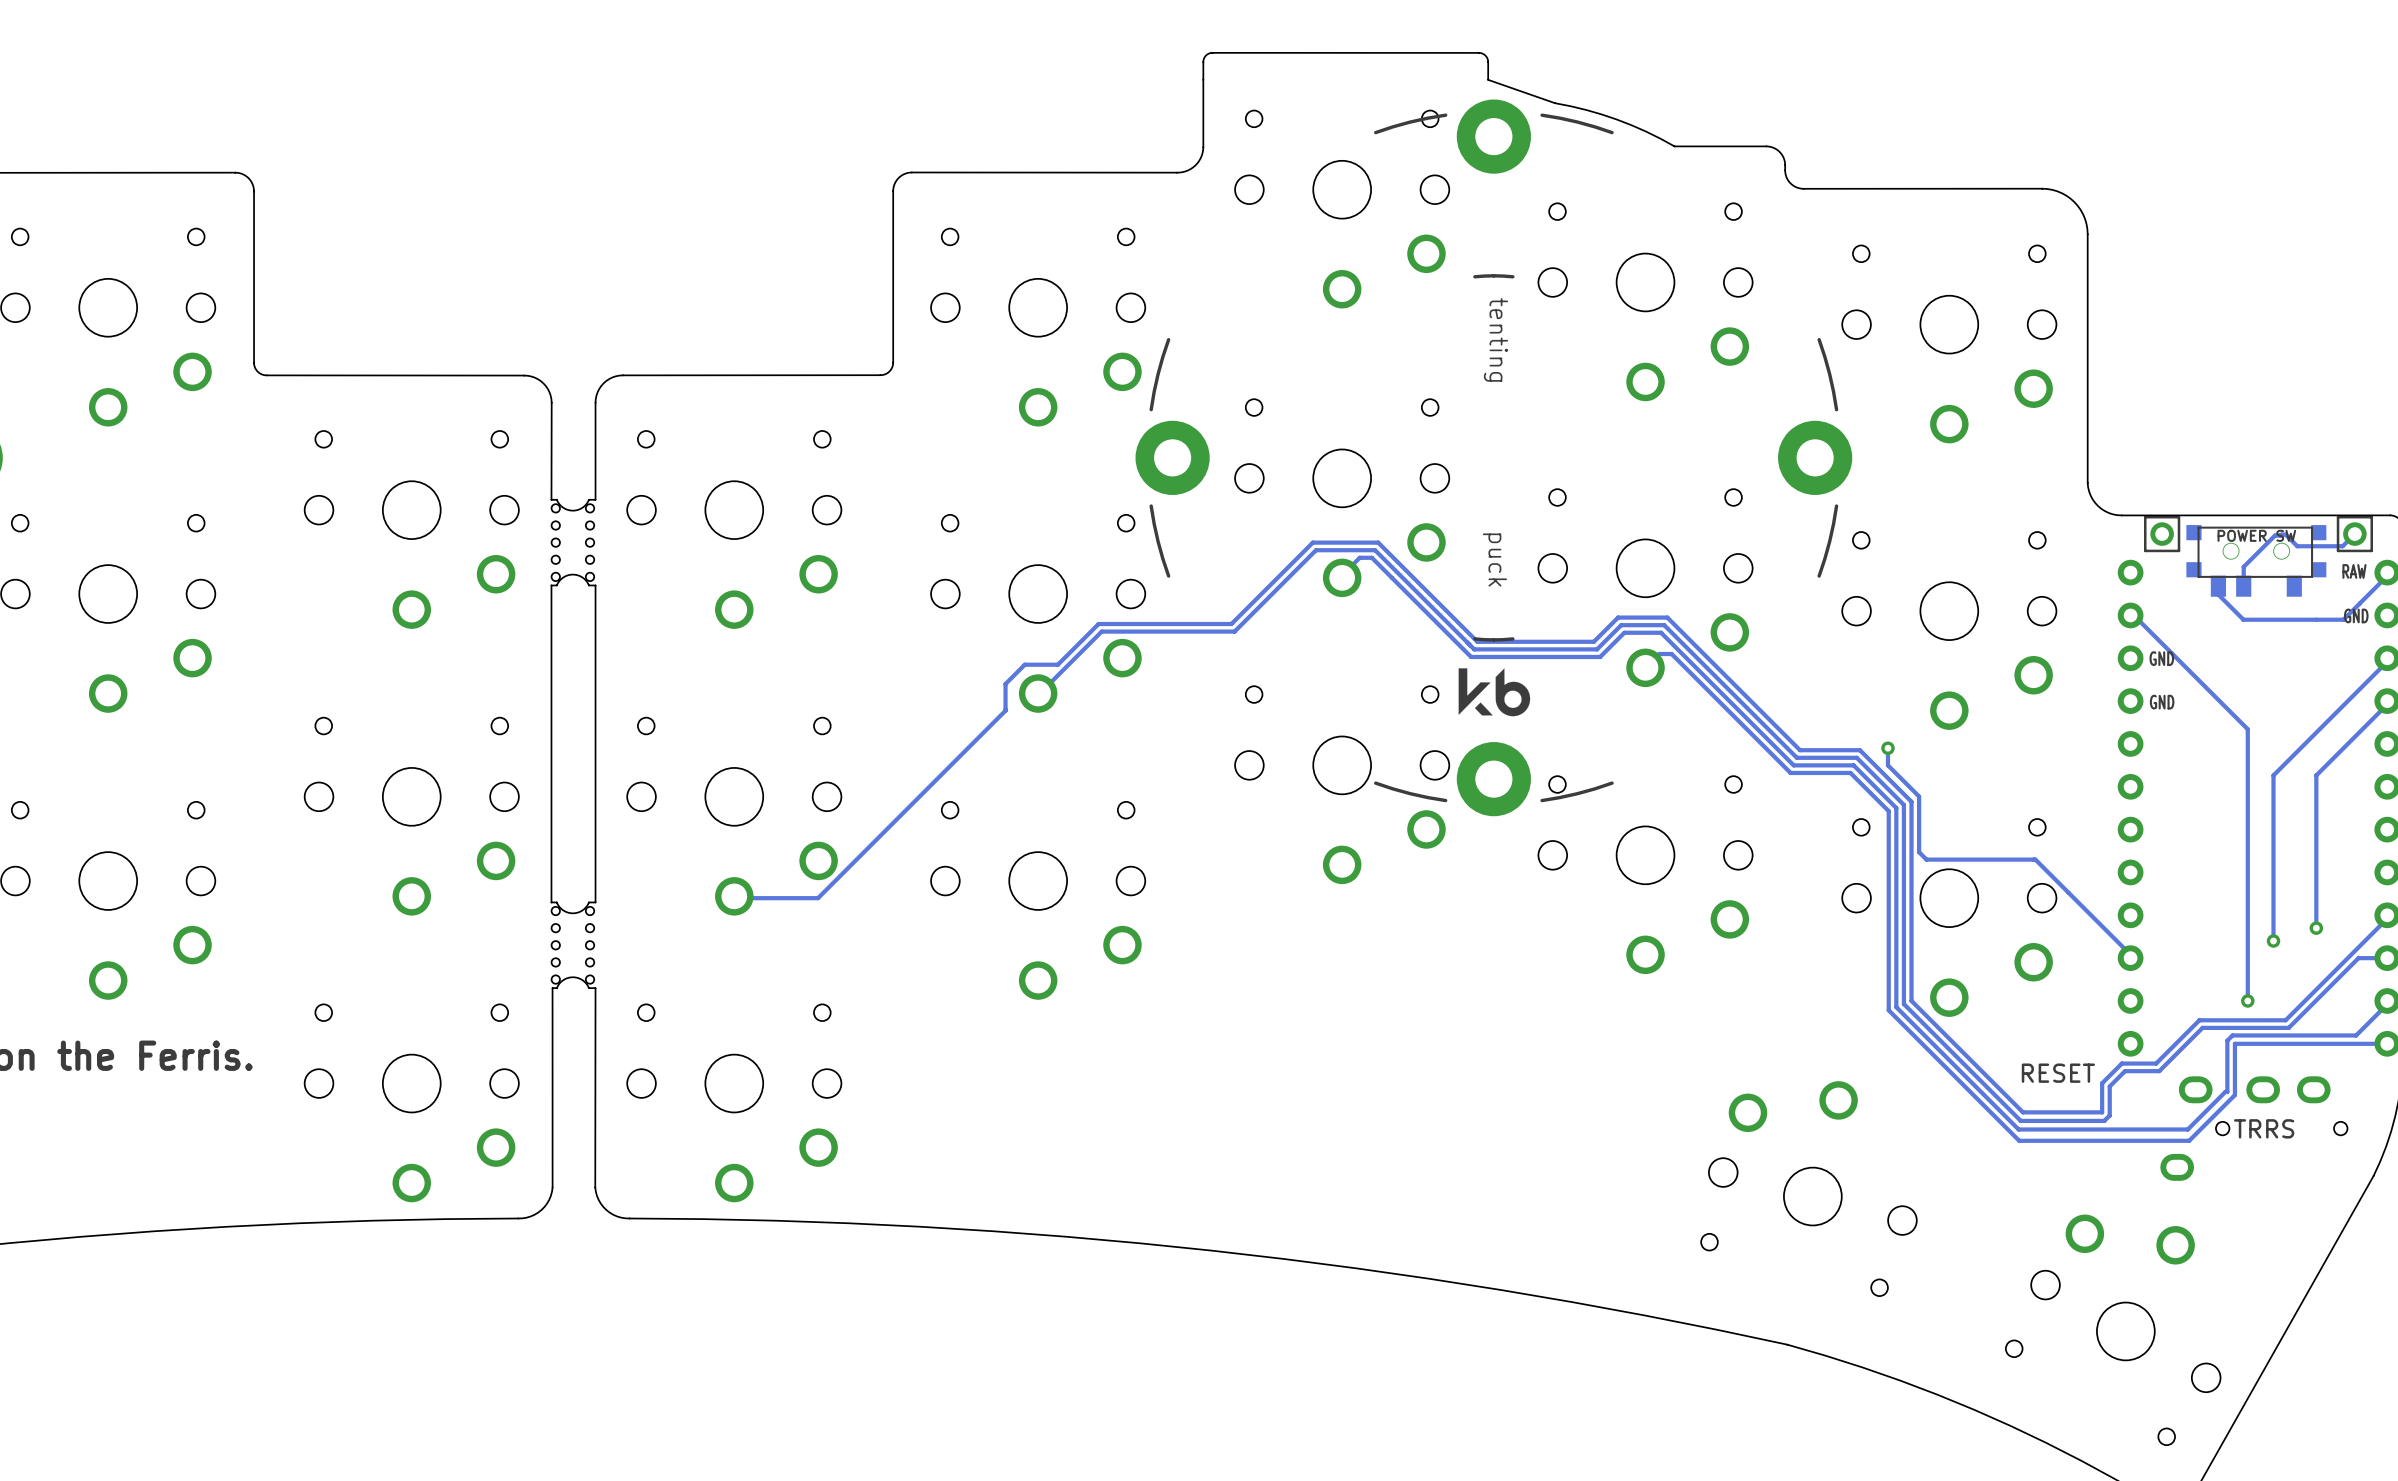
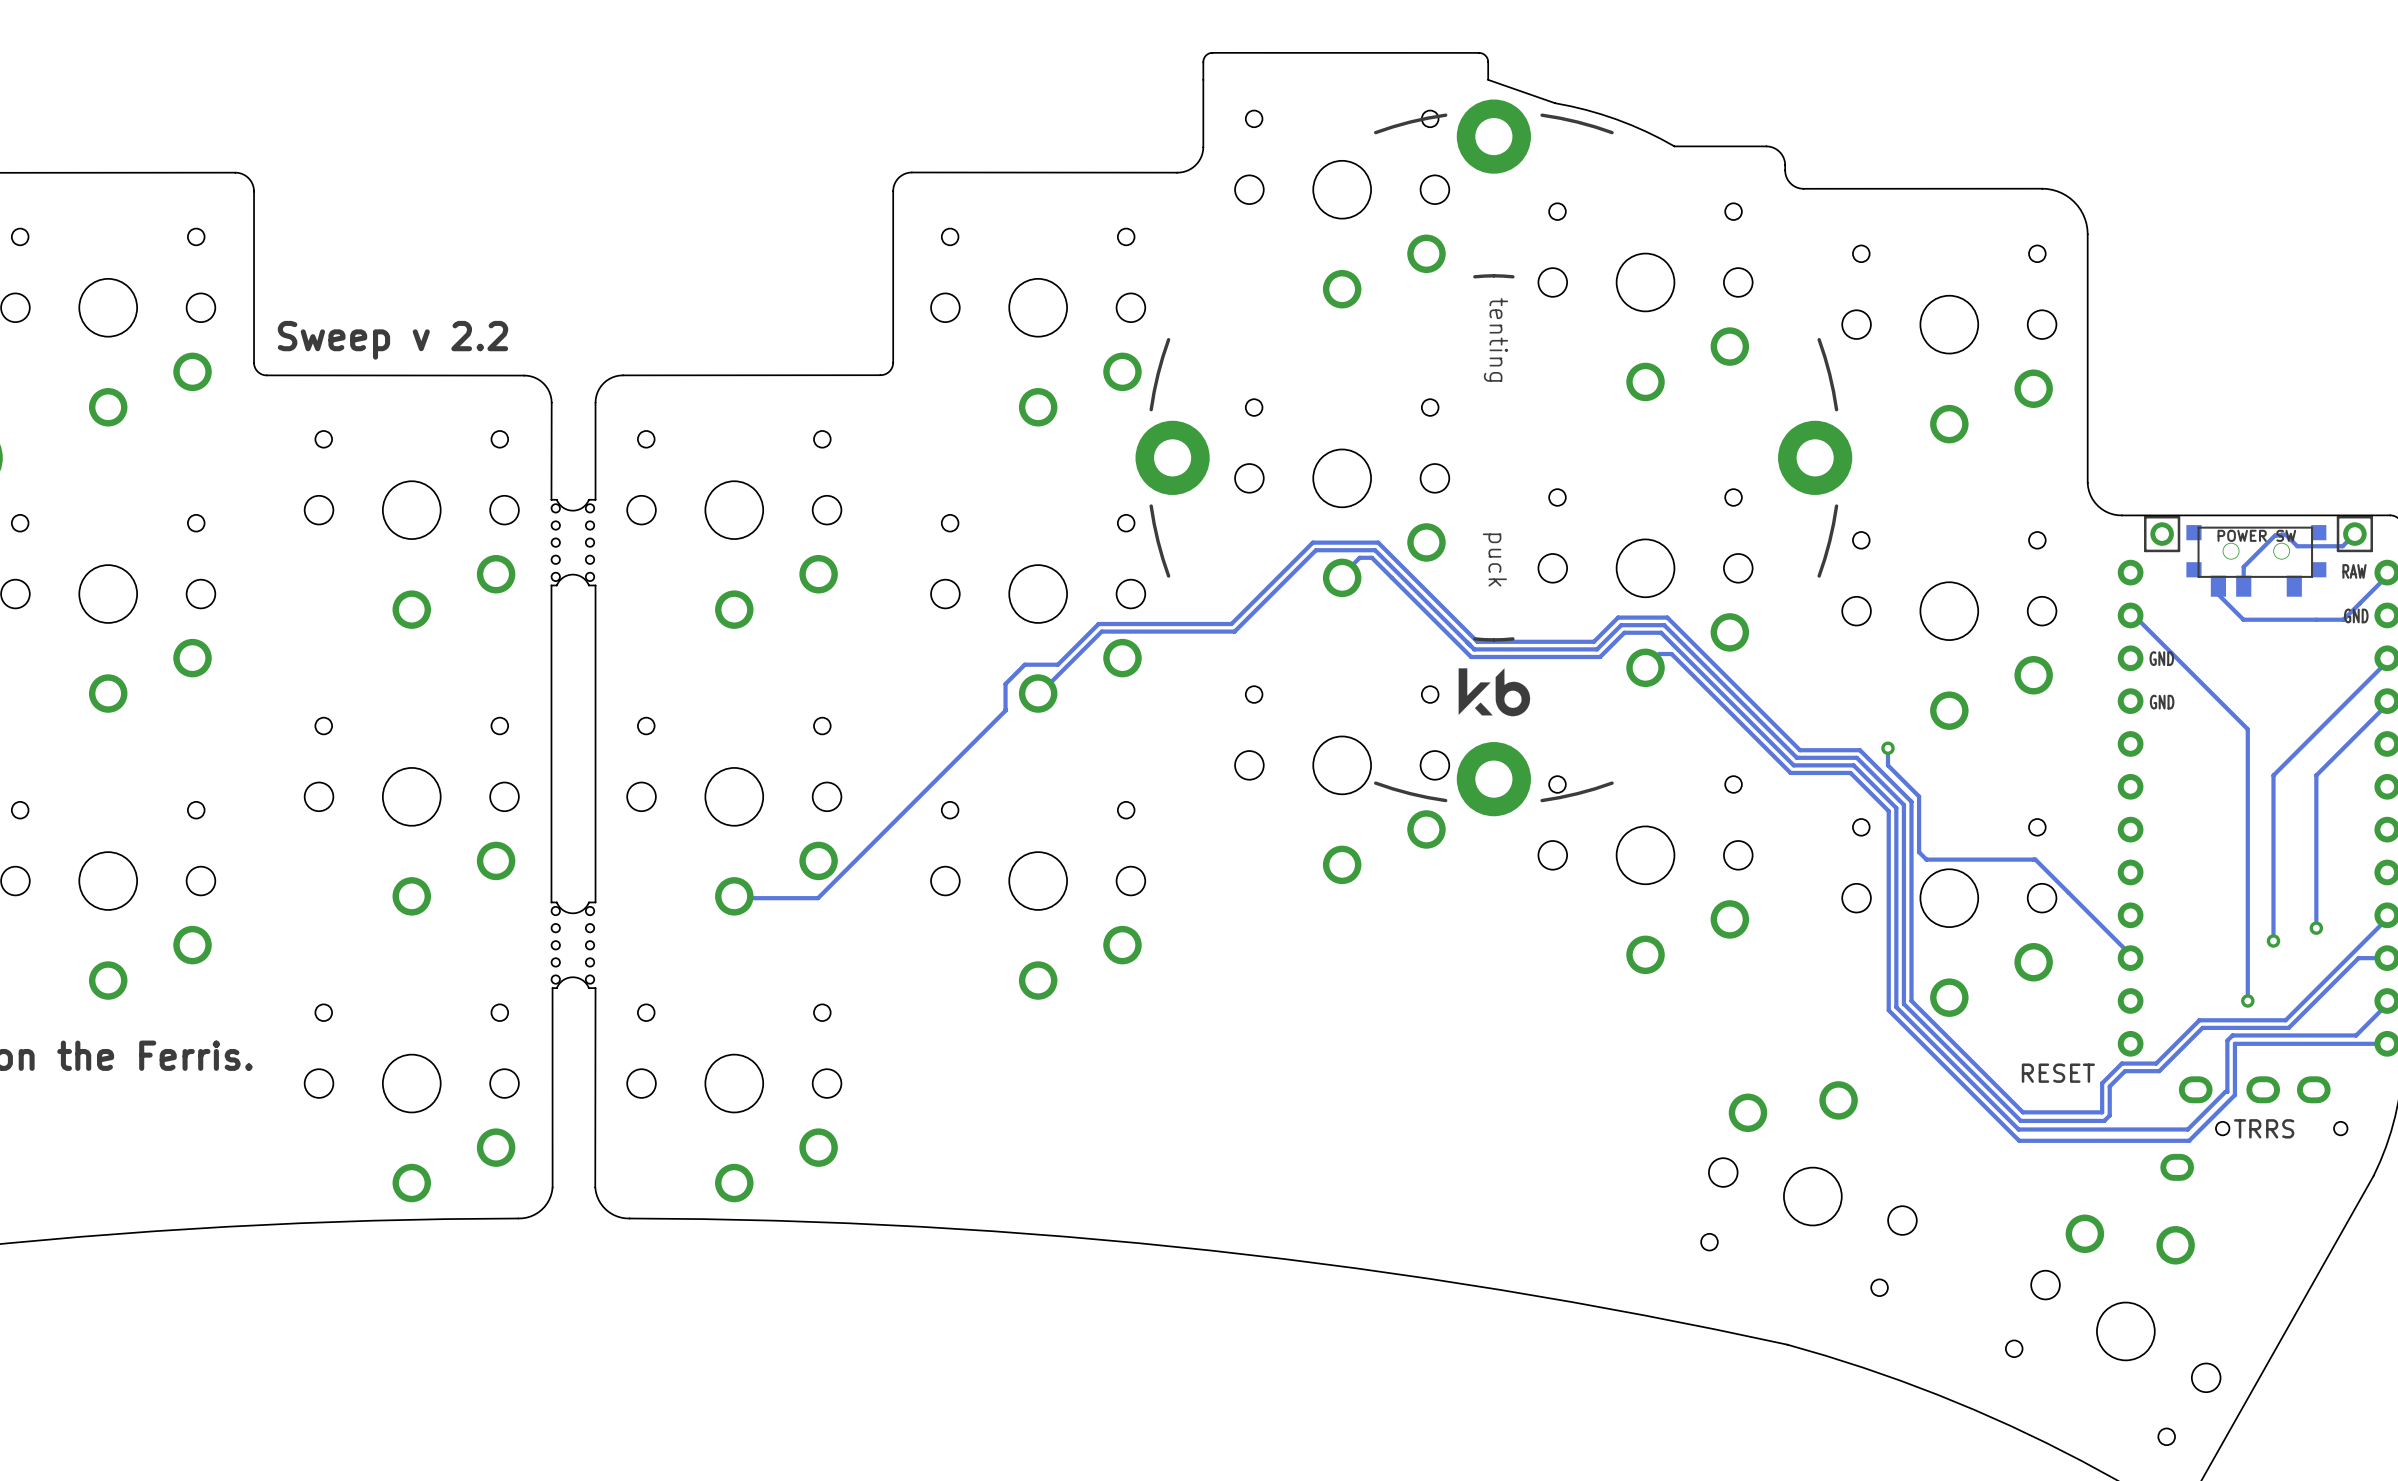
text: none -> Sweep v 2.2 (392, 340)

